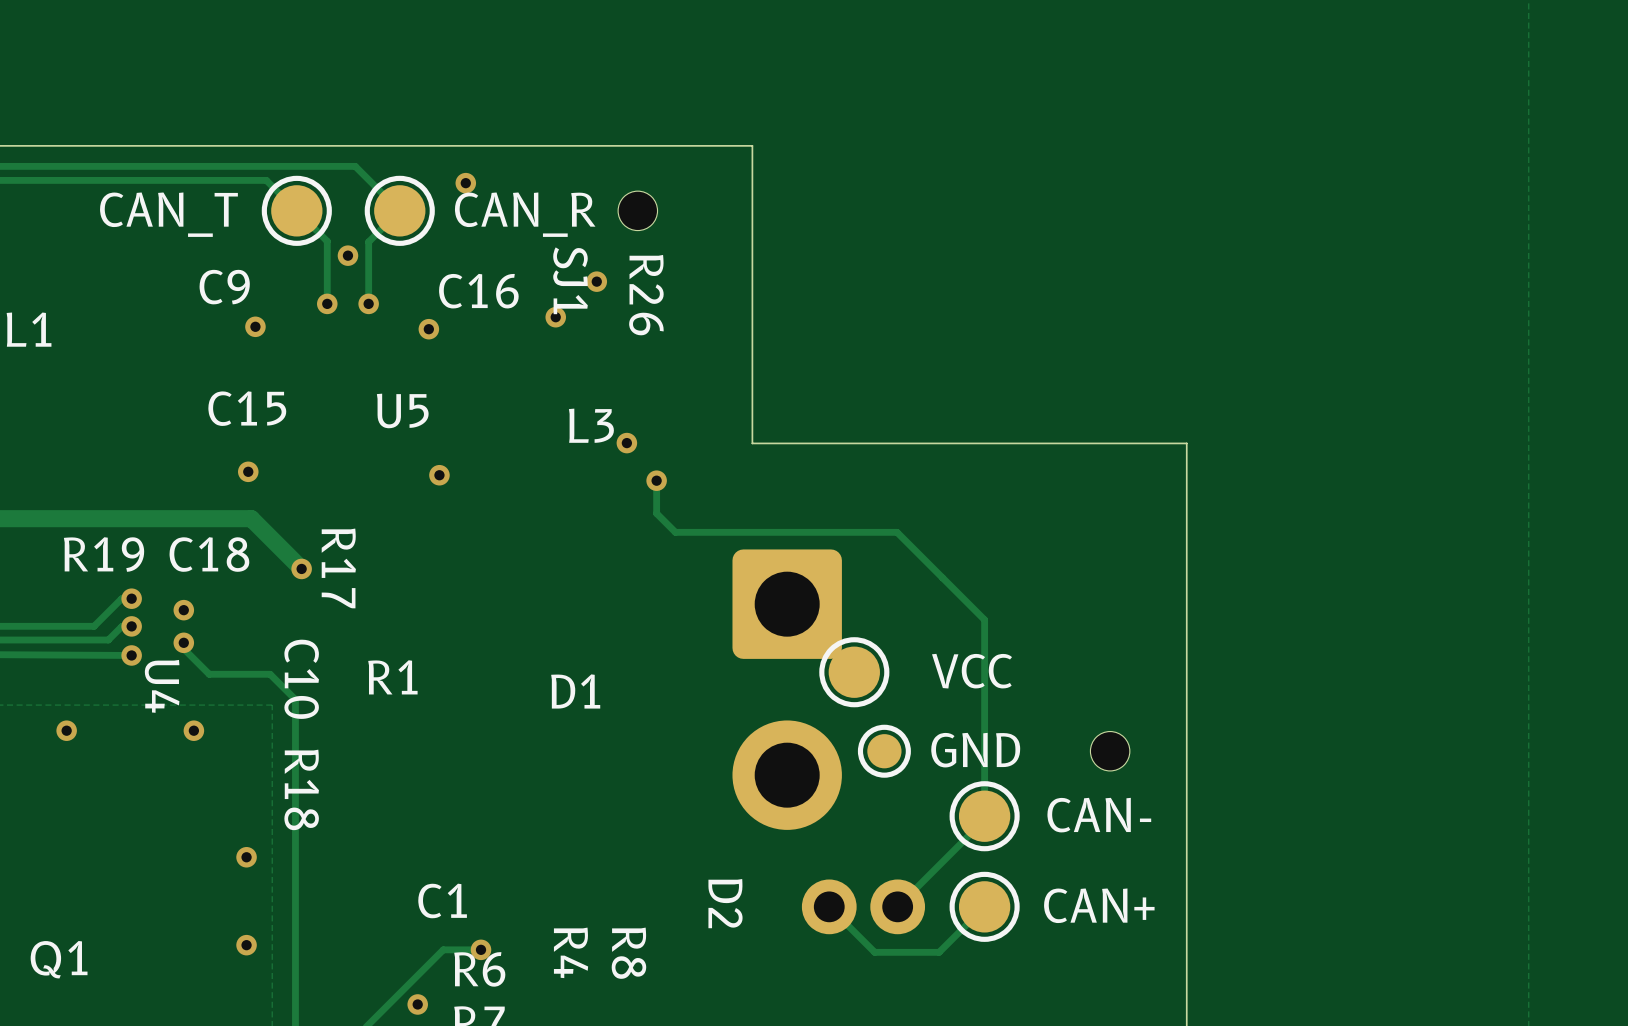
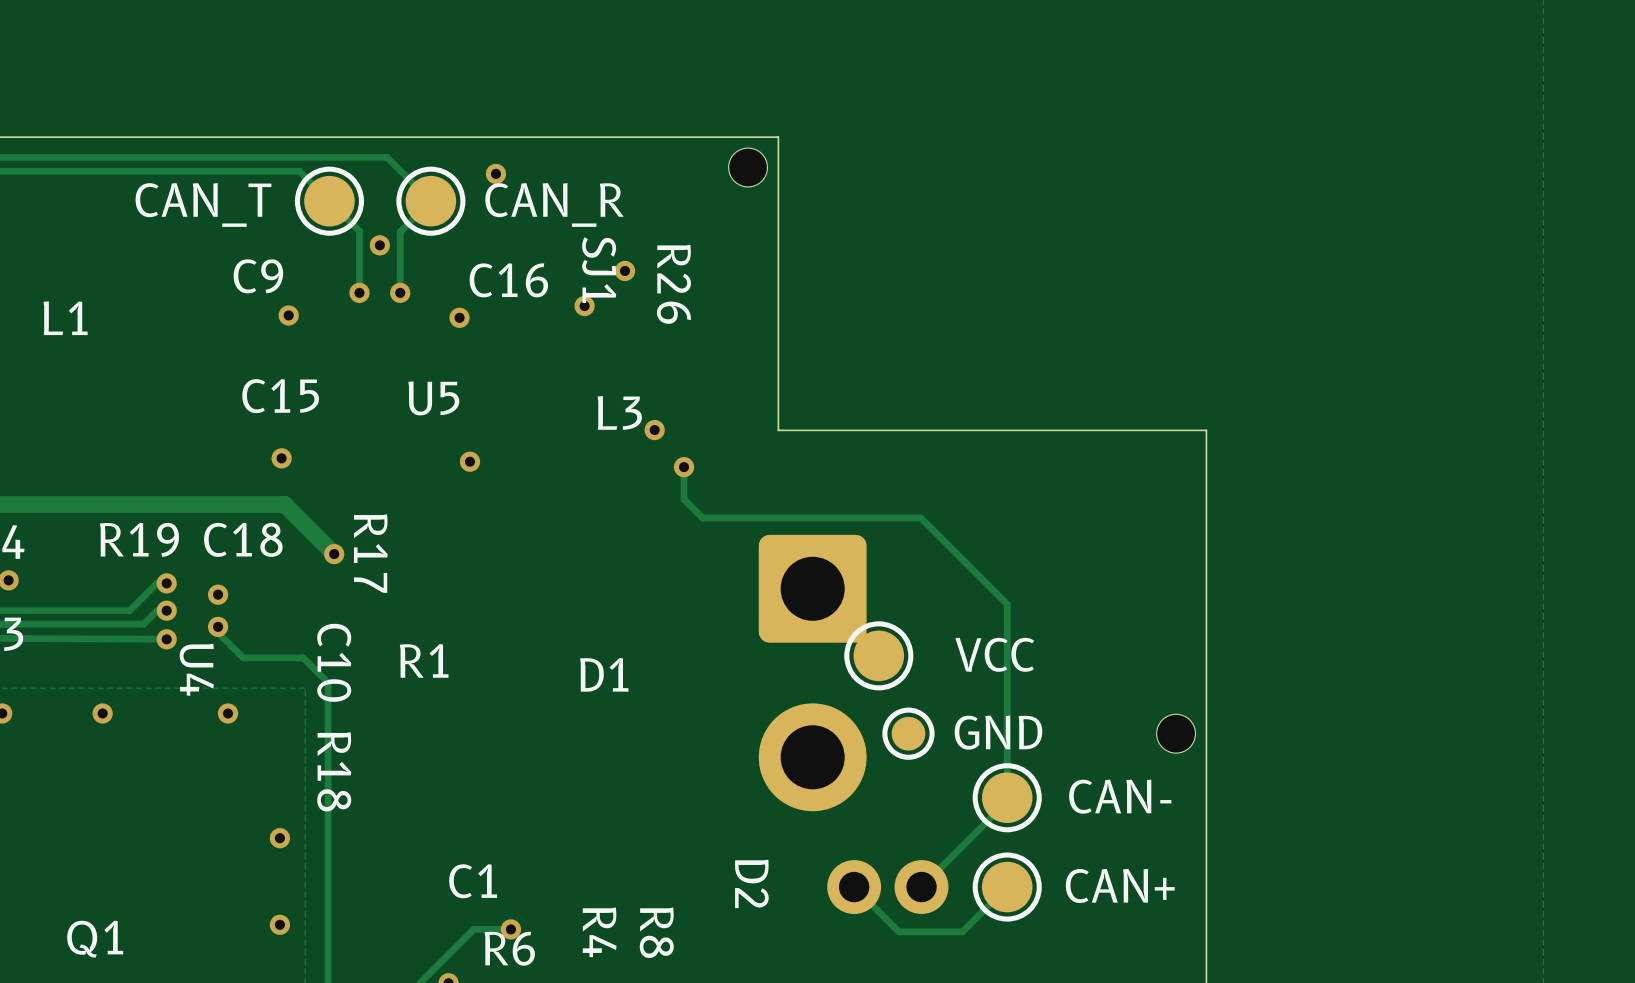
part position: (637, 210) -> (748, 167)
part position: (1110, 751) -> (1176, 733)

